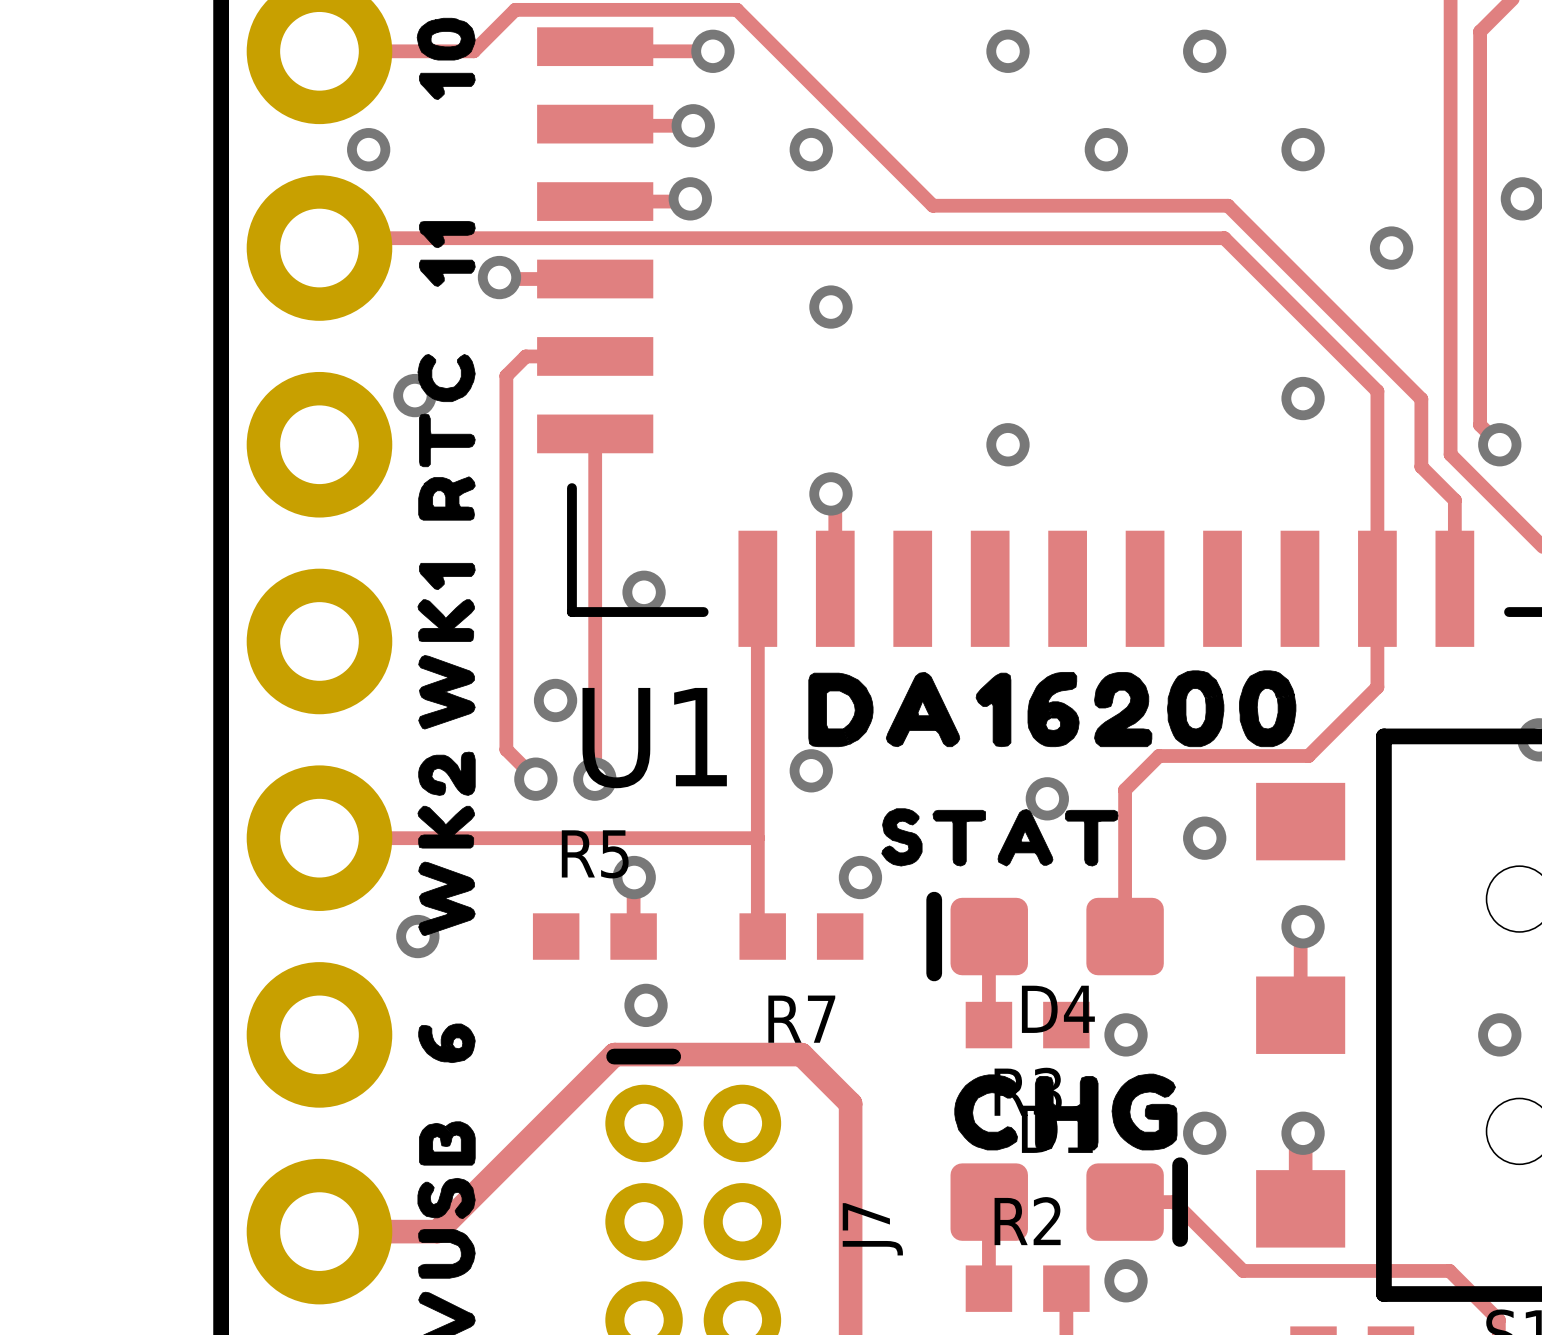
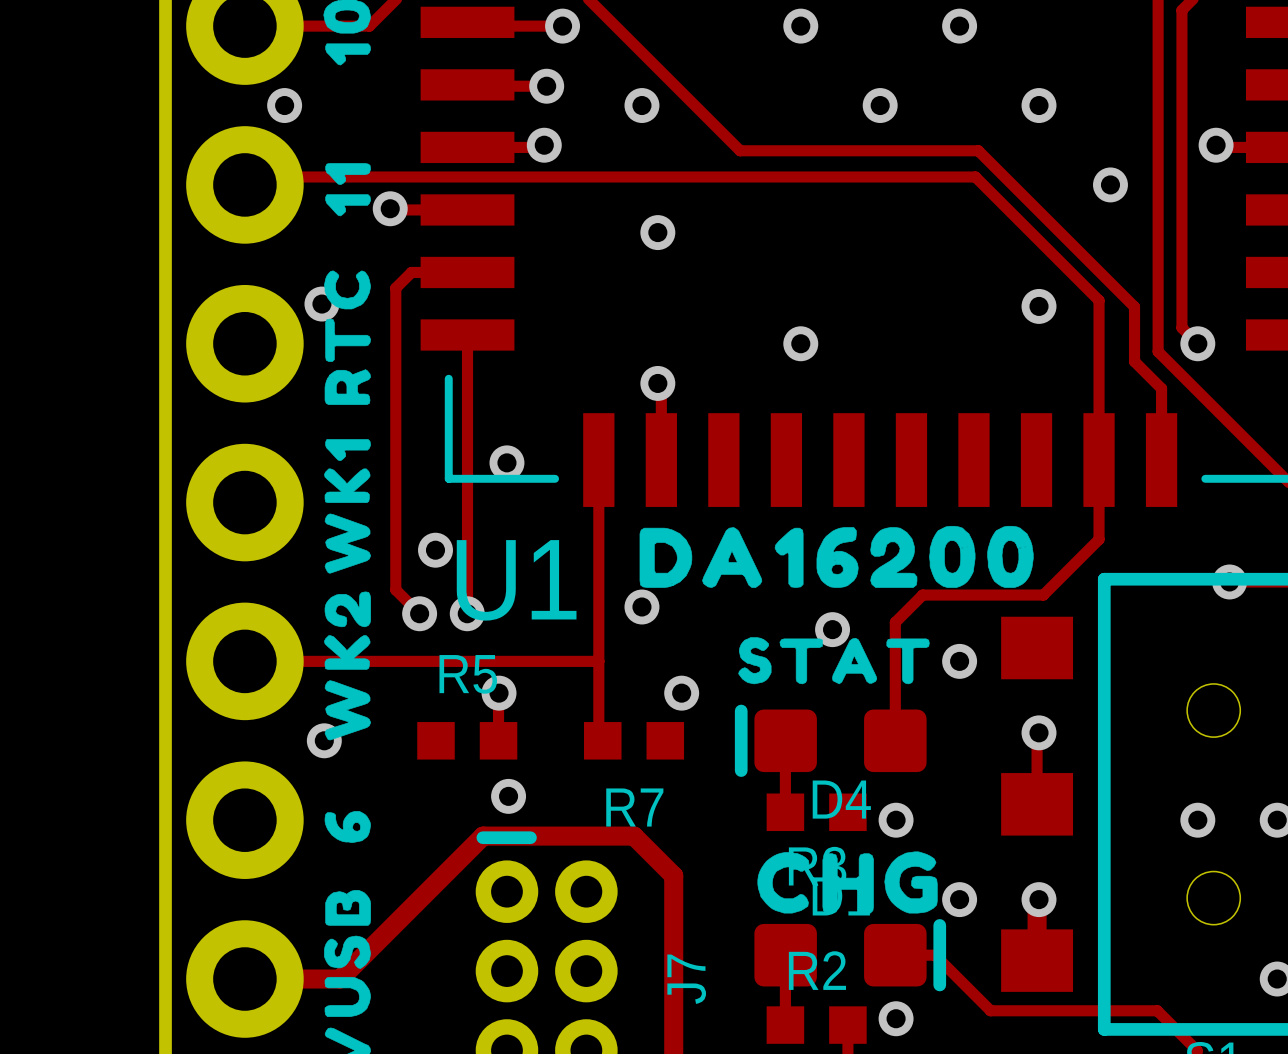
drawing position: (999, 837) -> (833, 660)

